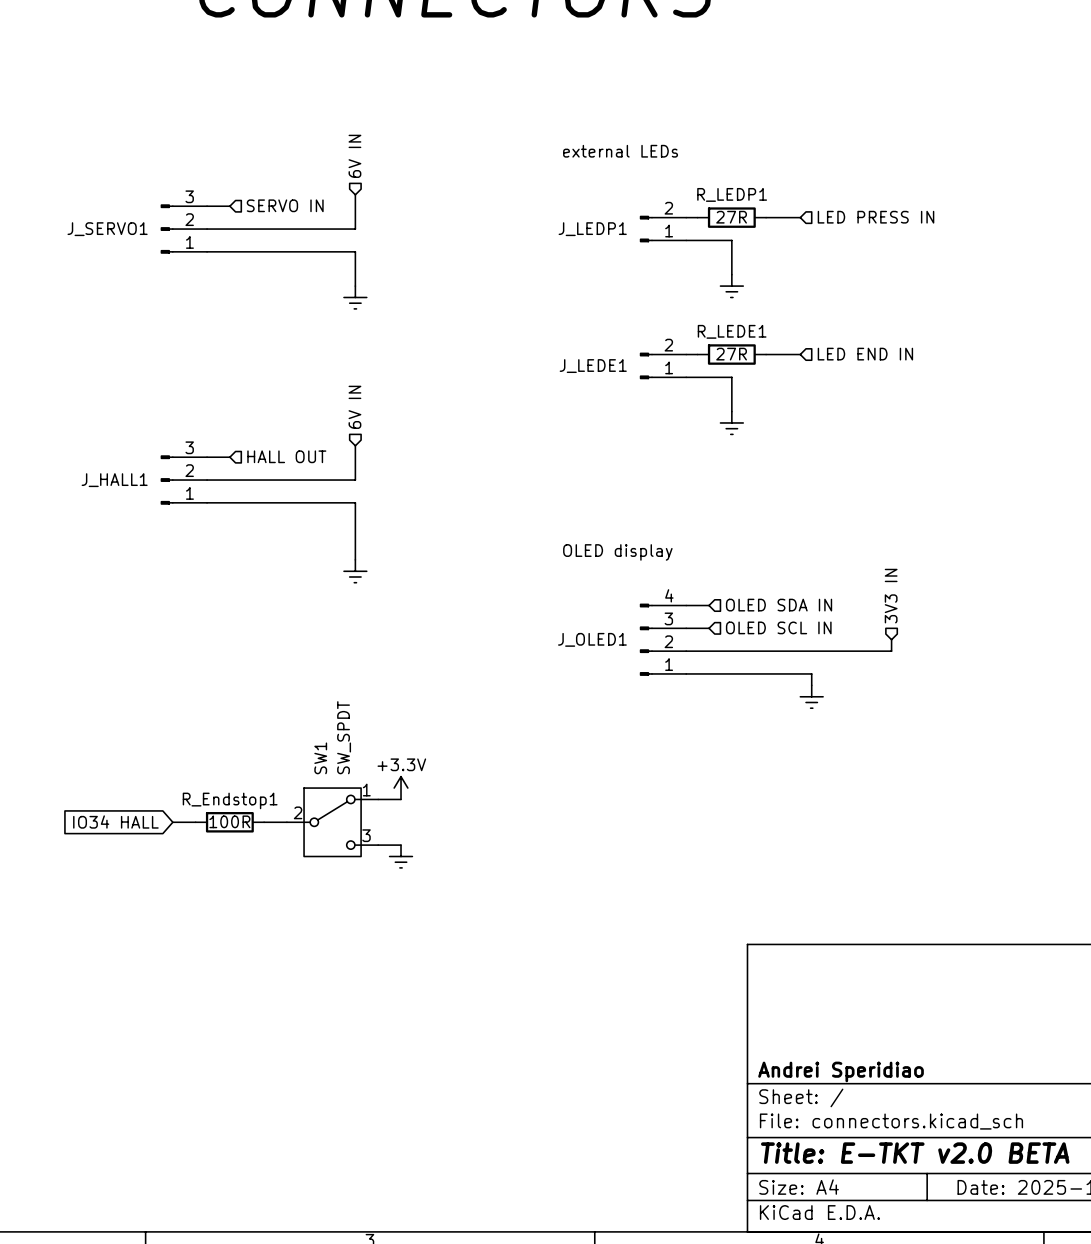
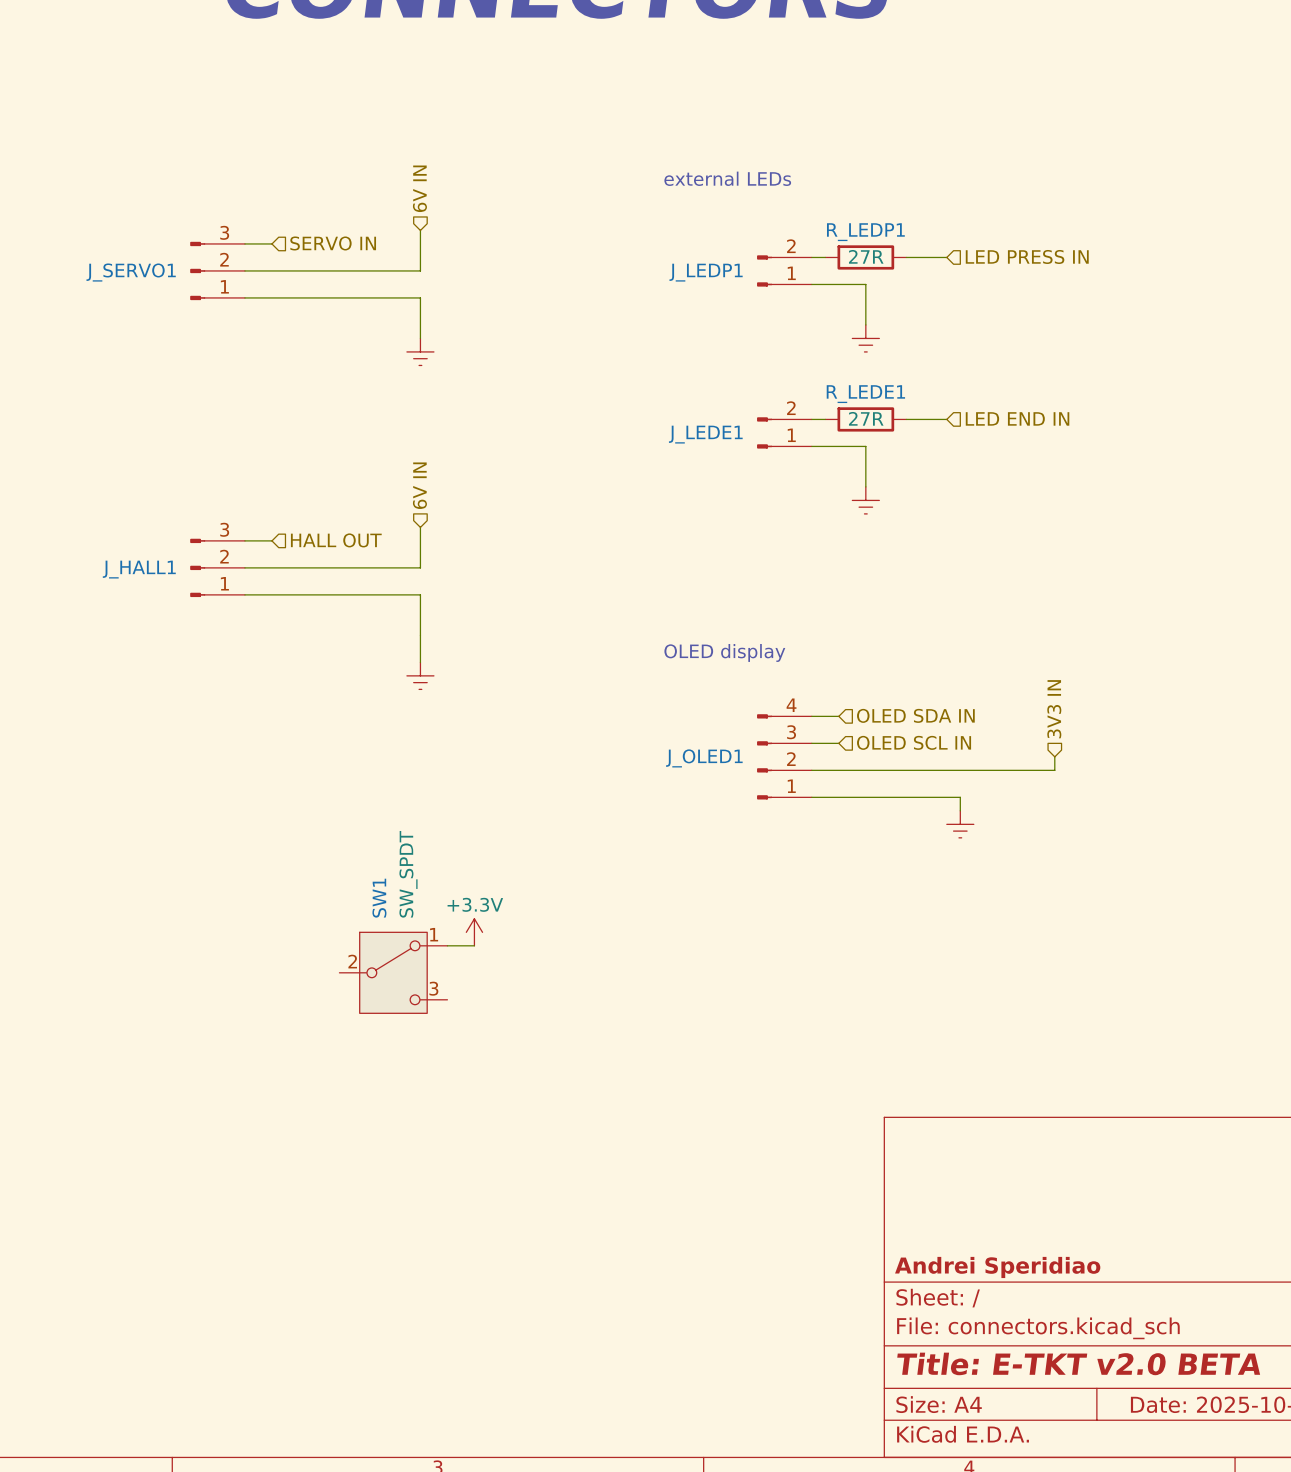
global label: IO34 HALL (115, 822) -> none
wire: (172, 822) (195, 822) -> none
R_Endstop1: 100R (229, 822) -> none
wire: (264, 822) (286, 822) -> none
wire: (378, 845) (401, 845) -> none
power symbol: (401, 856) -> none

